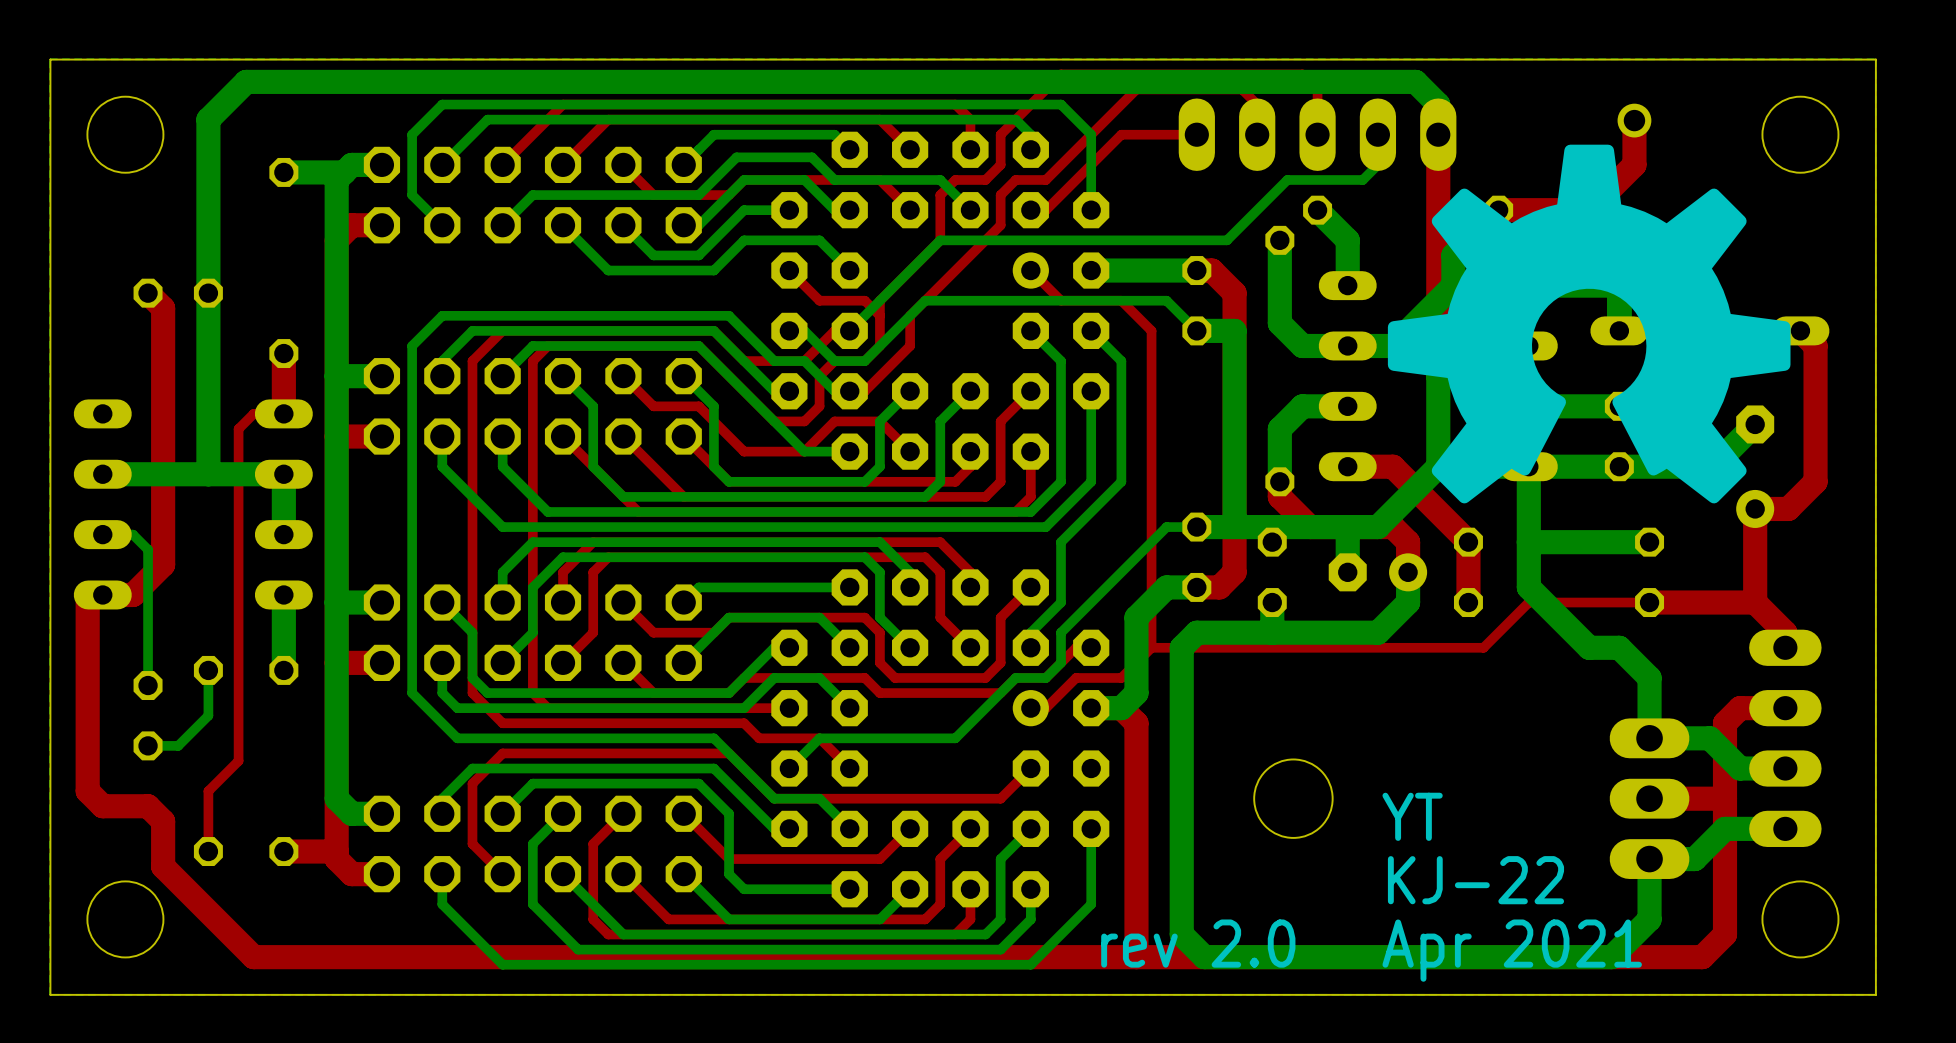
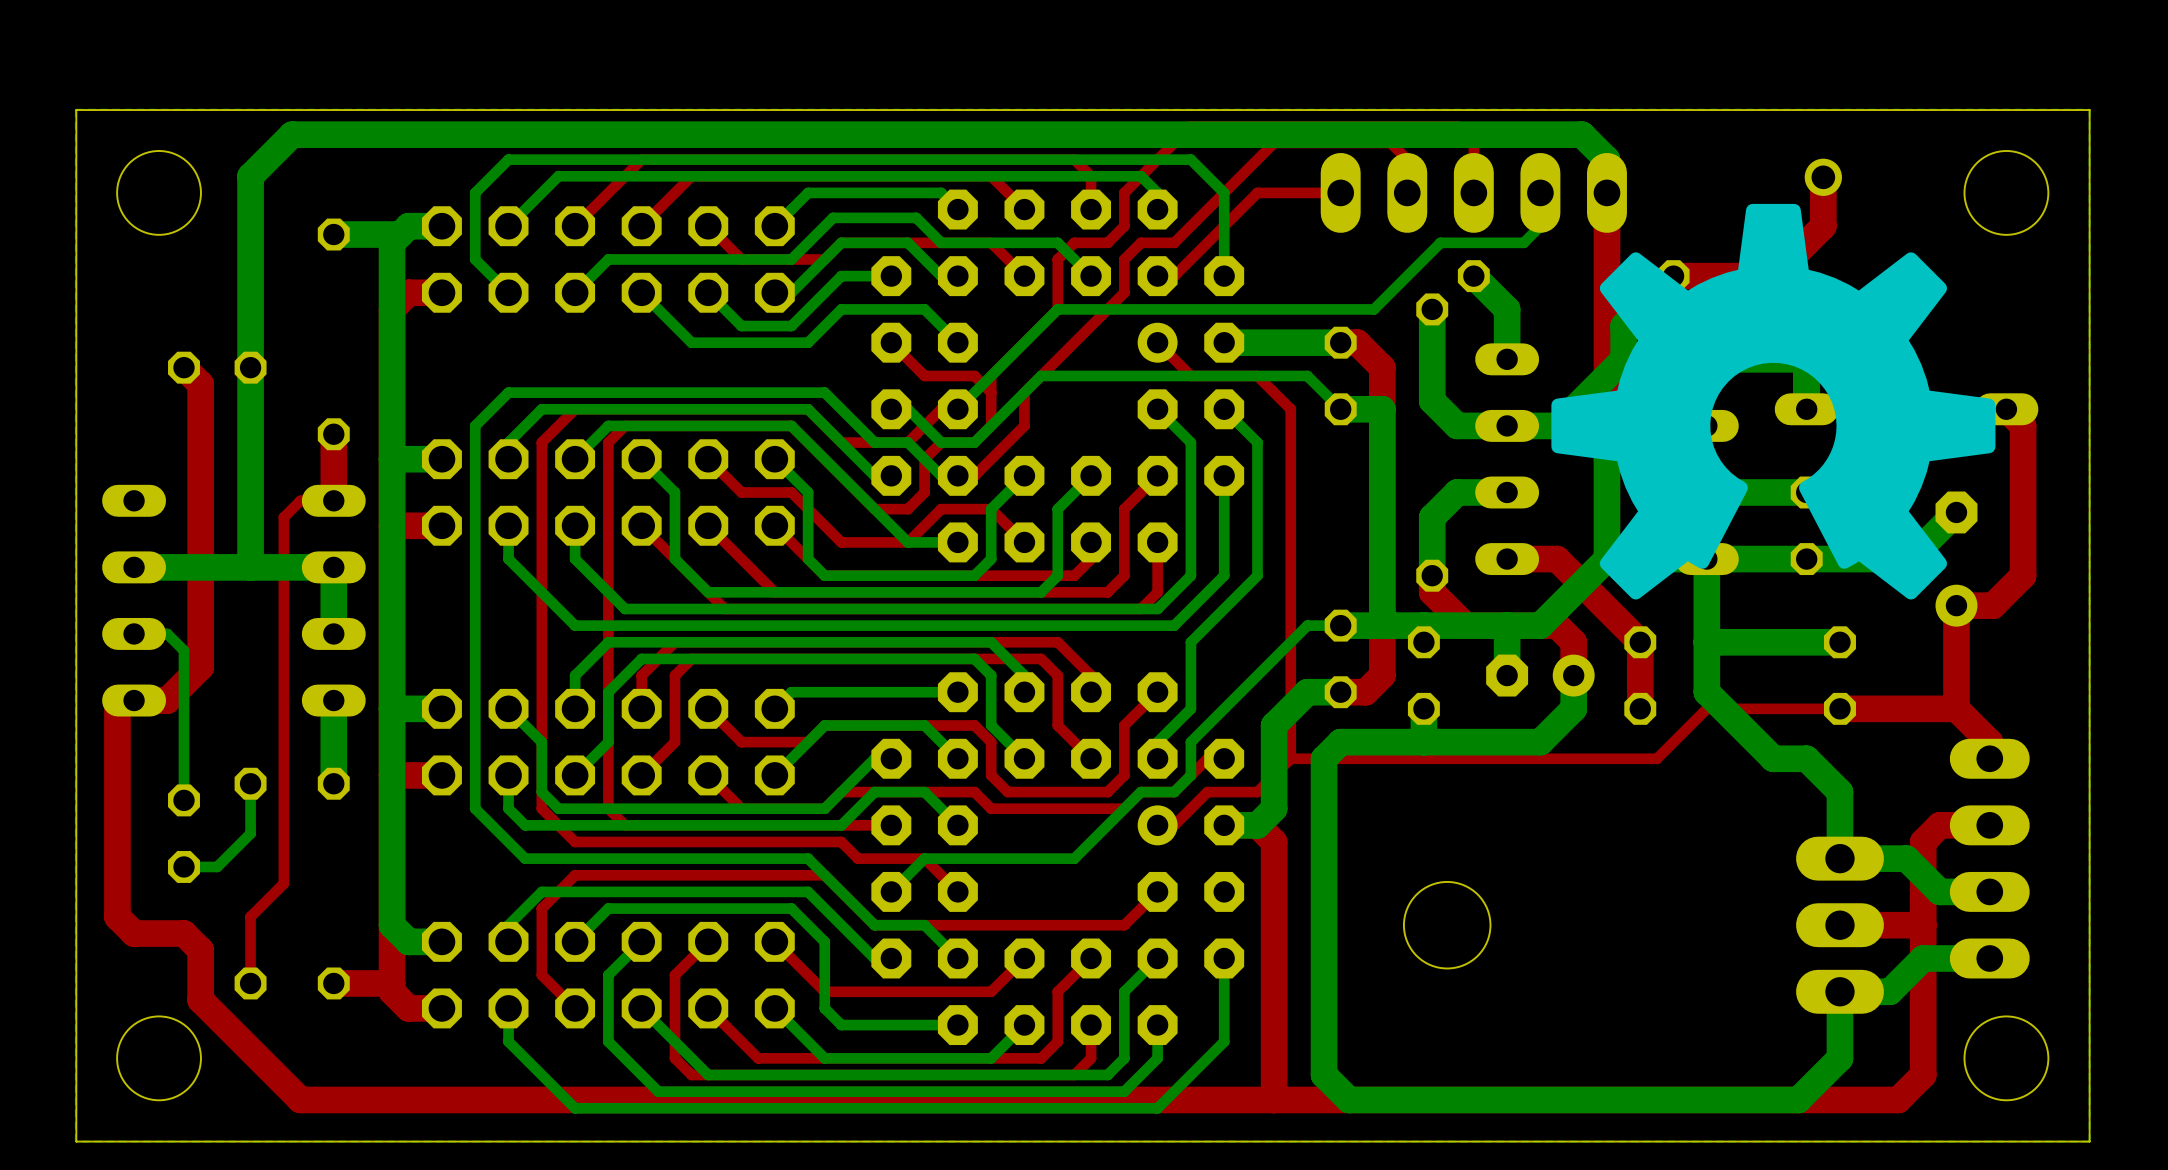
text: YT (1412, 816) -> none
text: KJ-22 (1475, 880) -> none
text: rev 2.0 (1198, 943) -> none
text: Apr 2021 (1512, 950) -> none

